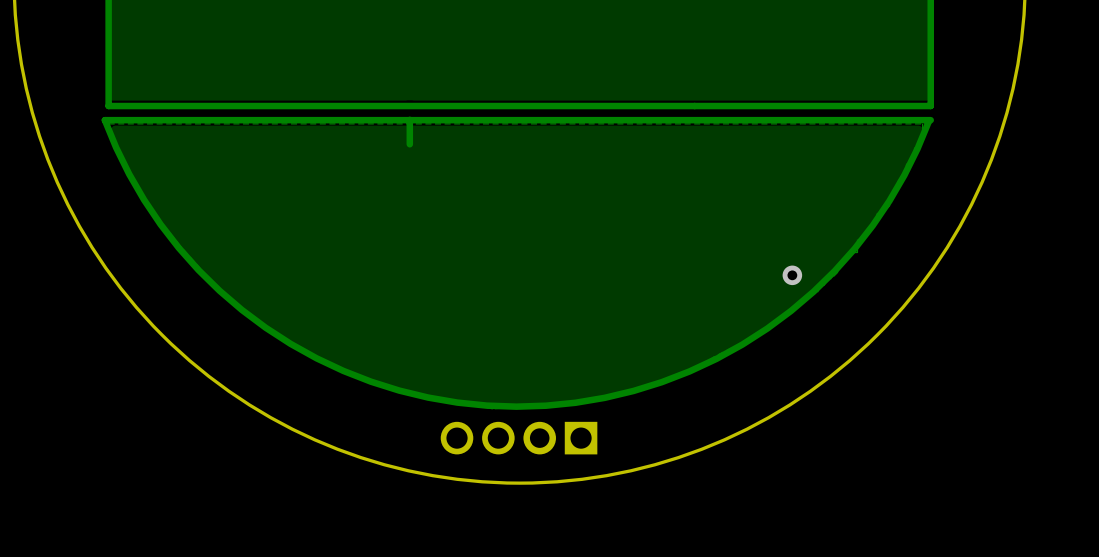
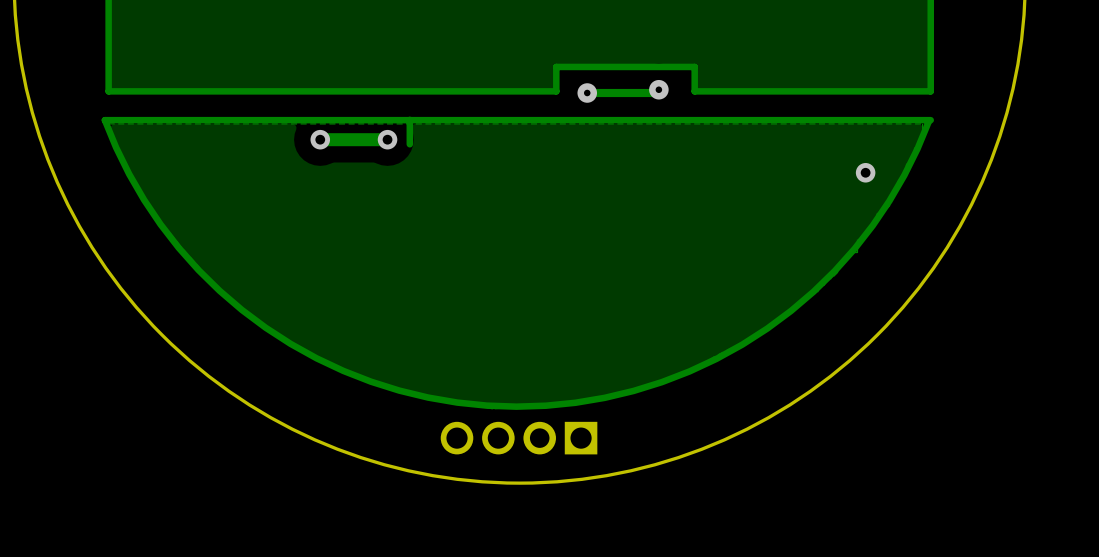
track: none -> (658, 89) (655, 93) (587, 93)
via: none -> (658, 89)
track: (930, 91) (930, 106) (108, 106) (108, 91) -> (930, 91) (694, 91) (694, 66) (556, 66) (556, 91) (108, 91)
via: none -> (587, 93)
track: none -> (388, 138) (320, 139)
via: none -> (320, 139)
via: none -> (387, 139)
via position: (792, 275) -> (865, 172)

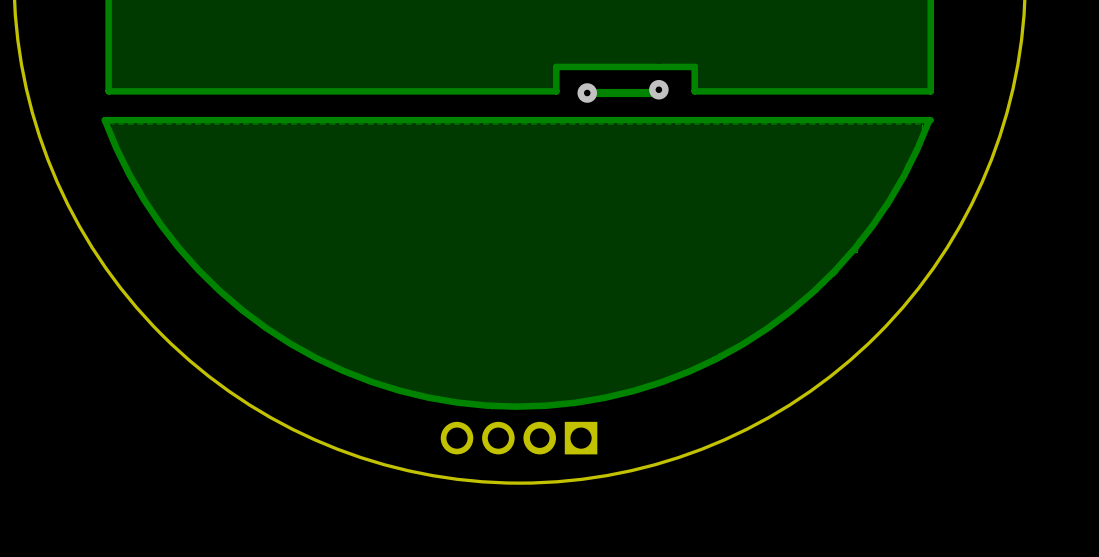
track: (409, 119) (409, 144) -> none
track: (388, 138) (320, 139) -> none
via: (320, 139) -> none
via: (387, 139) -> none
via: (865, 172) -> none

